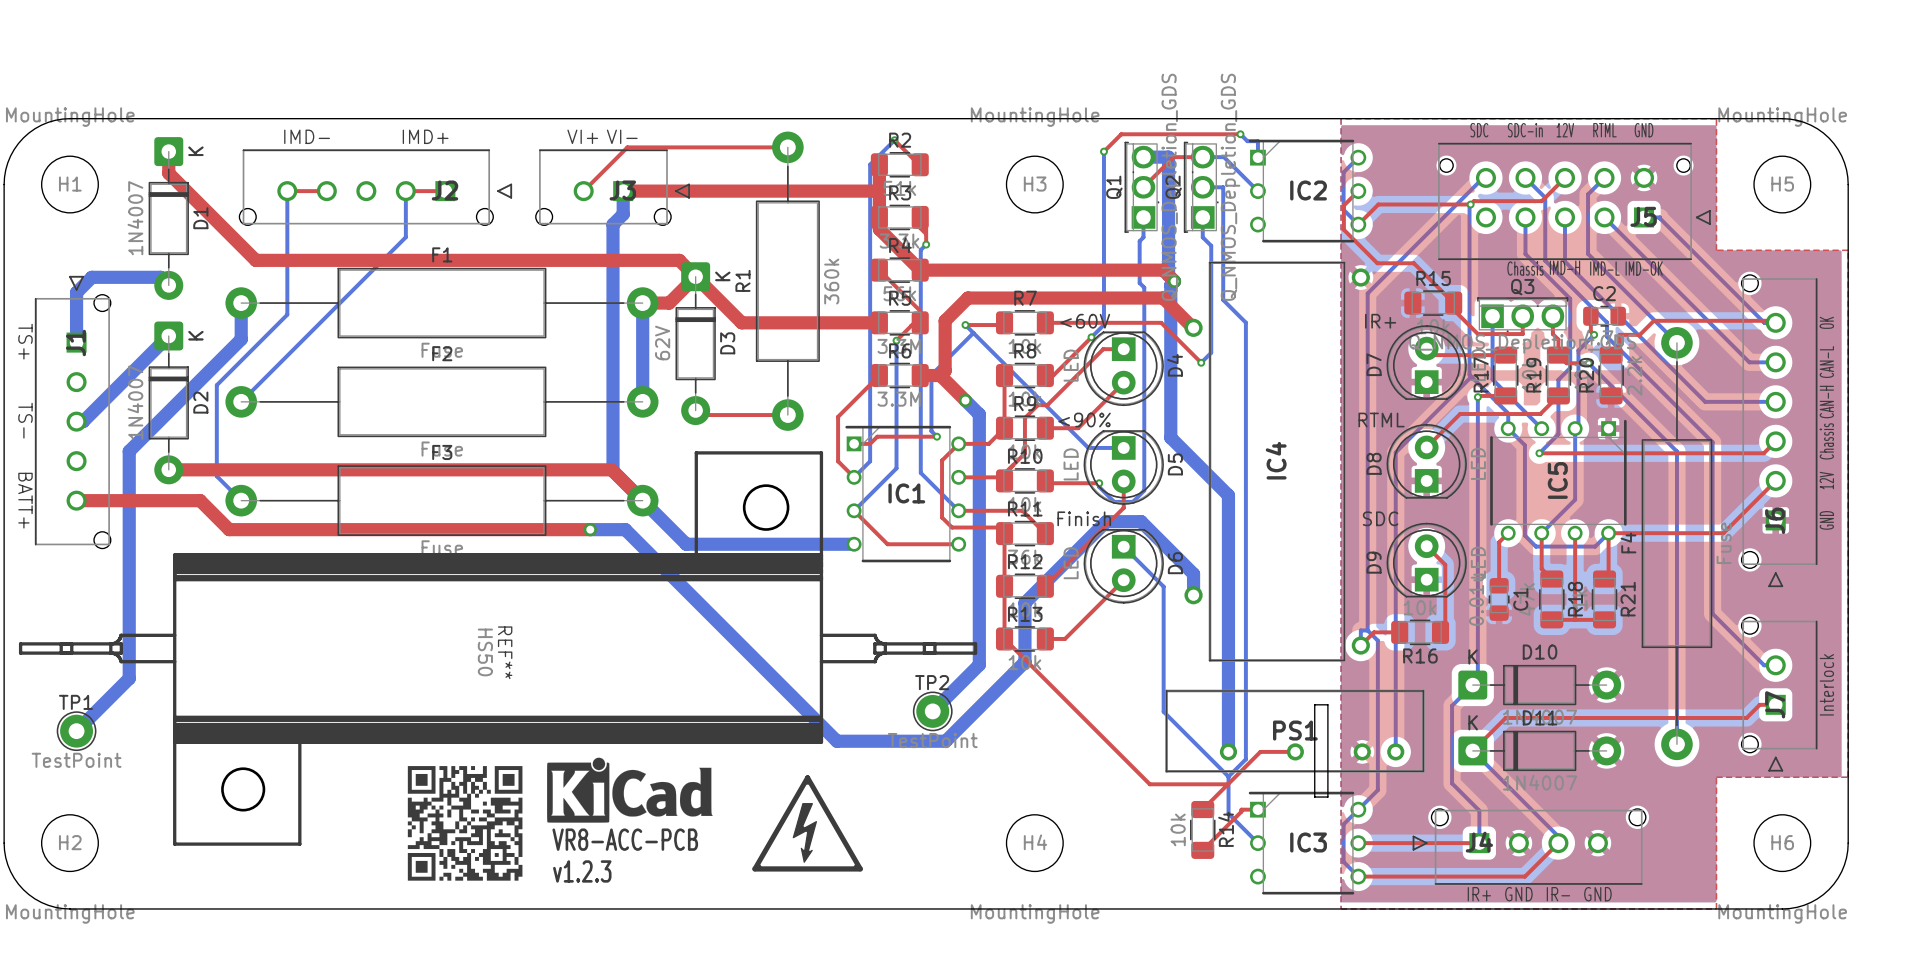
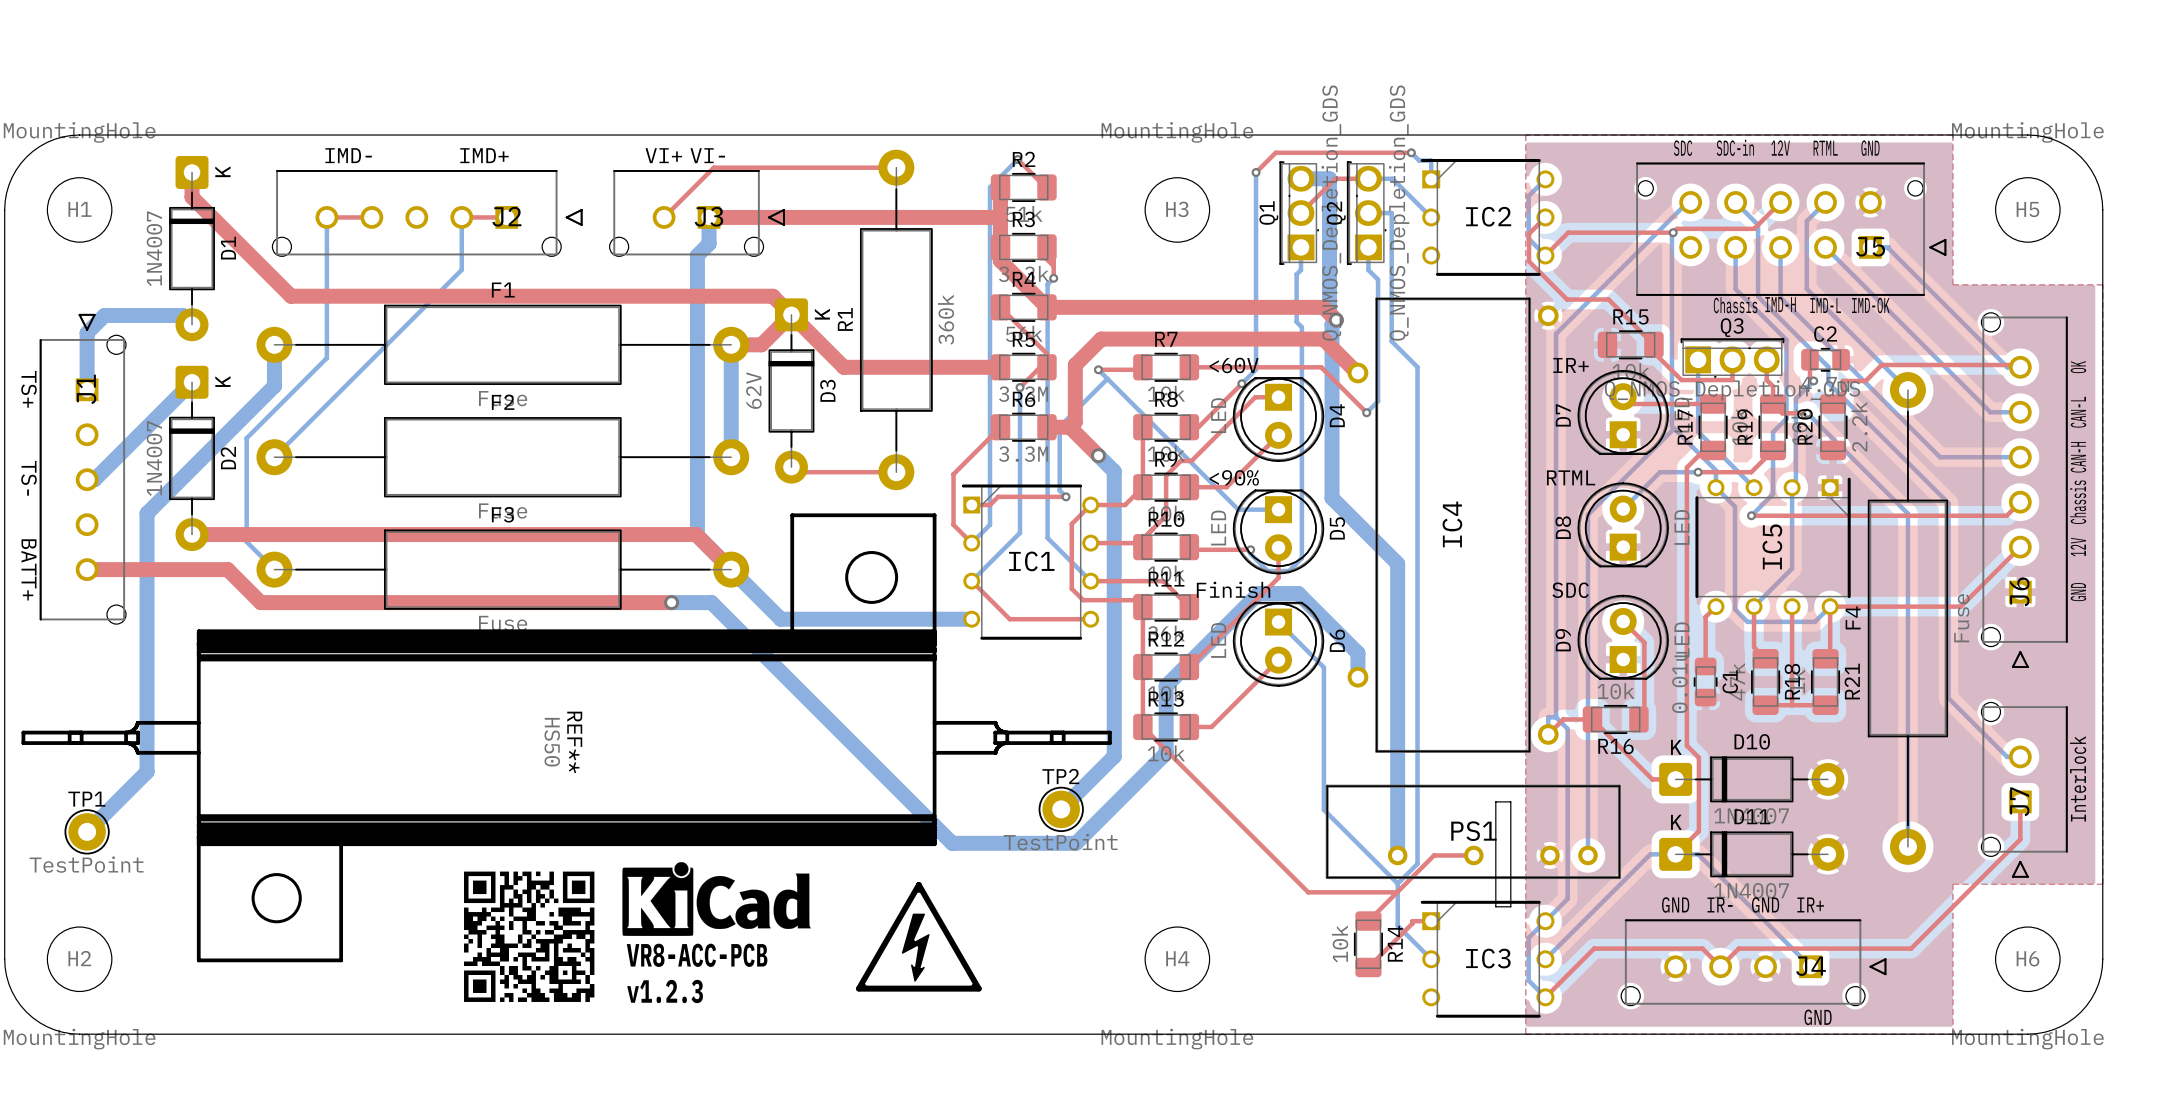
top track: none -> (1703, 450) (1686, 467) (1686, 745) (1698, 757) (1698, 831)
top track: (1505, 395) (1477, 397) -> none
bottom track: (1477, 397) (1477, 679) -> none
via position: (1477, 397) -> (1698, 472)
top track: (1540, 414) (1460, 414) (1426, 447) -> (1752, 471) (1698, 472)
bottom track: none -> (1698, 472) (1660, 472) (1623, 509)
top track: none -> (1592, 719) (1652, 779) (1675, 779)
bottom track: (1472, 685) (1452, 705) (1452, 783) (1479, 810) (1479, 843) -> none
top track: (1775, 704) (1759, 704) (1746, 717) (1505, 717) (1493, 730) -> (2020, 801) (2020, 839) (1911, 948) (1738, 948) (1720, 966) (1702, 948) (1594, 948) (1545, 997)
bottom track: (1472, 750) (1558, 836) -> none
text: none -> GND (1675, 904)
text: none -> GND (1765, 904)
bottom track: none -> (1545, 959) (1650, 854) (1698, 854) (1810, 966)
top track: (1358, 843) (1479, 843) -> none
top track: (1558, 843) (1524, 876) (1358, 876) -> none
J4 rotation: 0° (1529, 846) -> 180° (1753, 962)
text position: IR+ (1479, 894) -> IR+ (1810, 904)
text: GND (1518, 894) -> none
text position: IR- (1558, 894) -> IR- (1720, 904)

